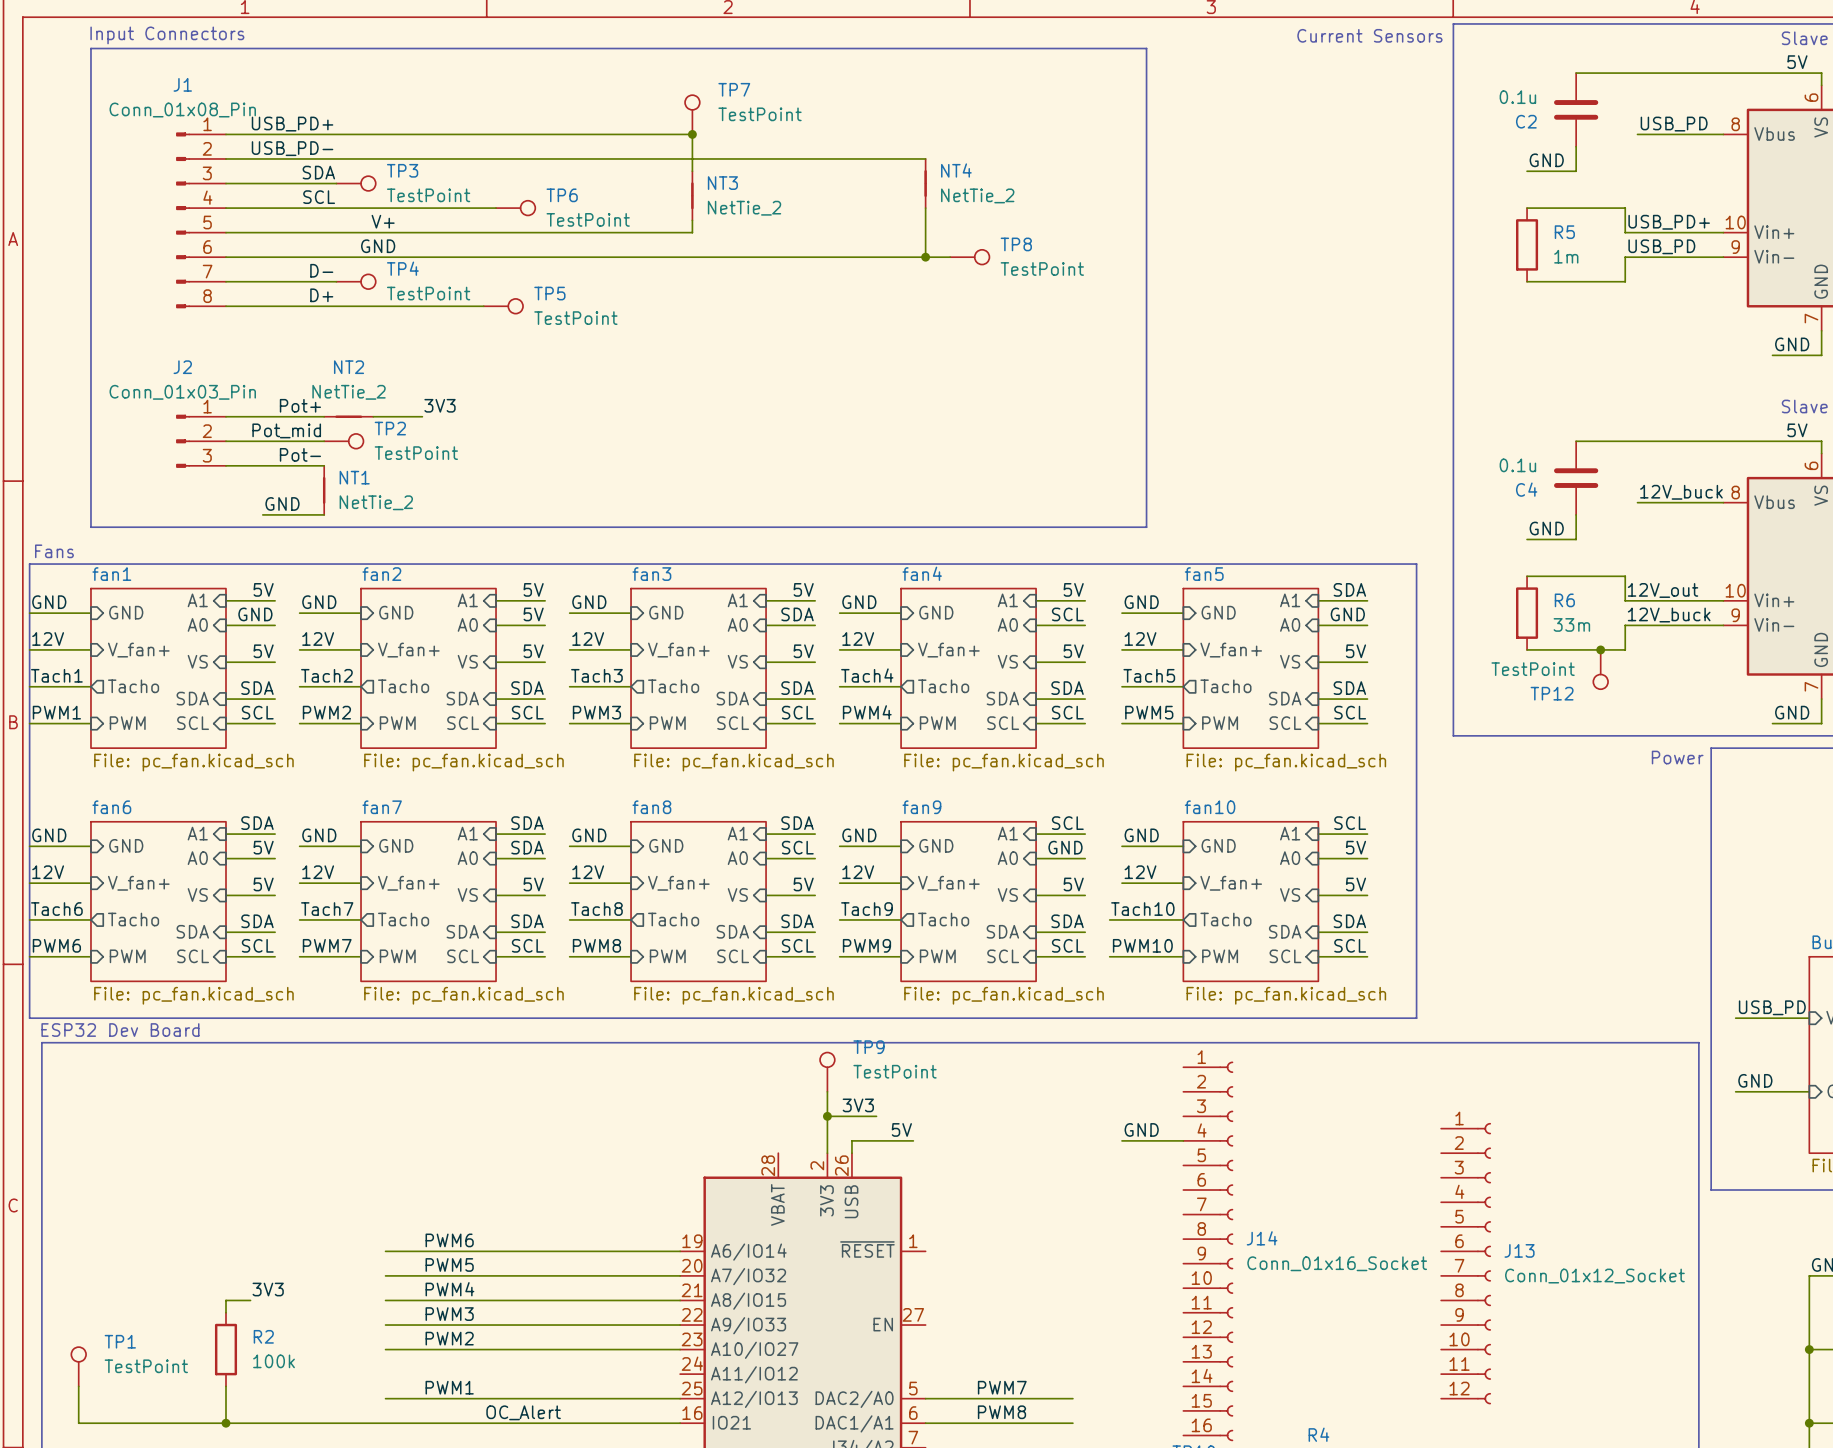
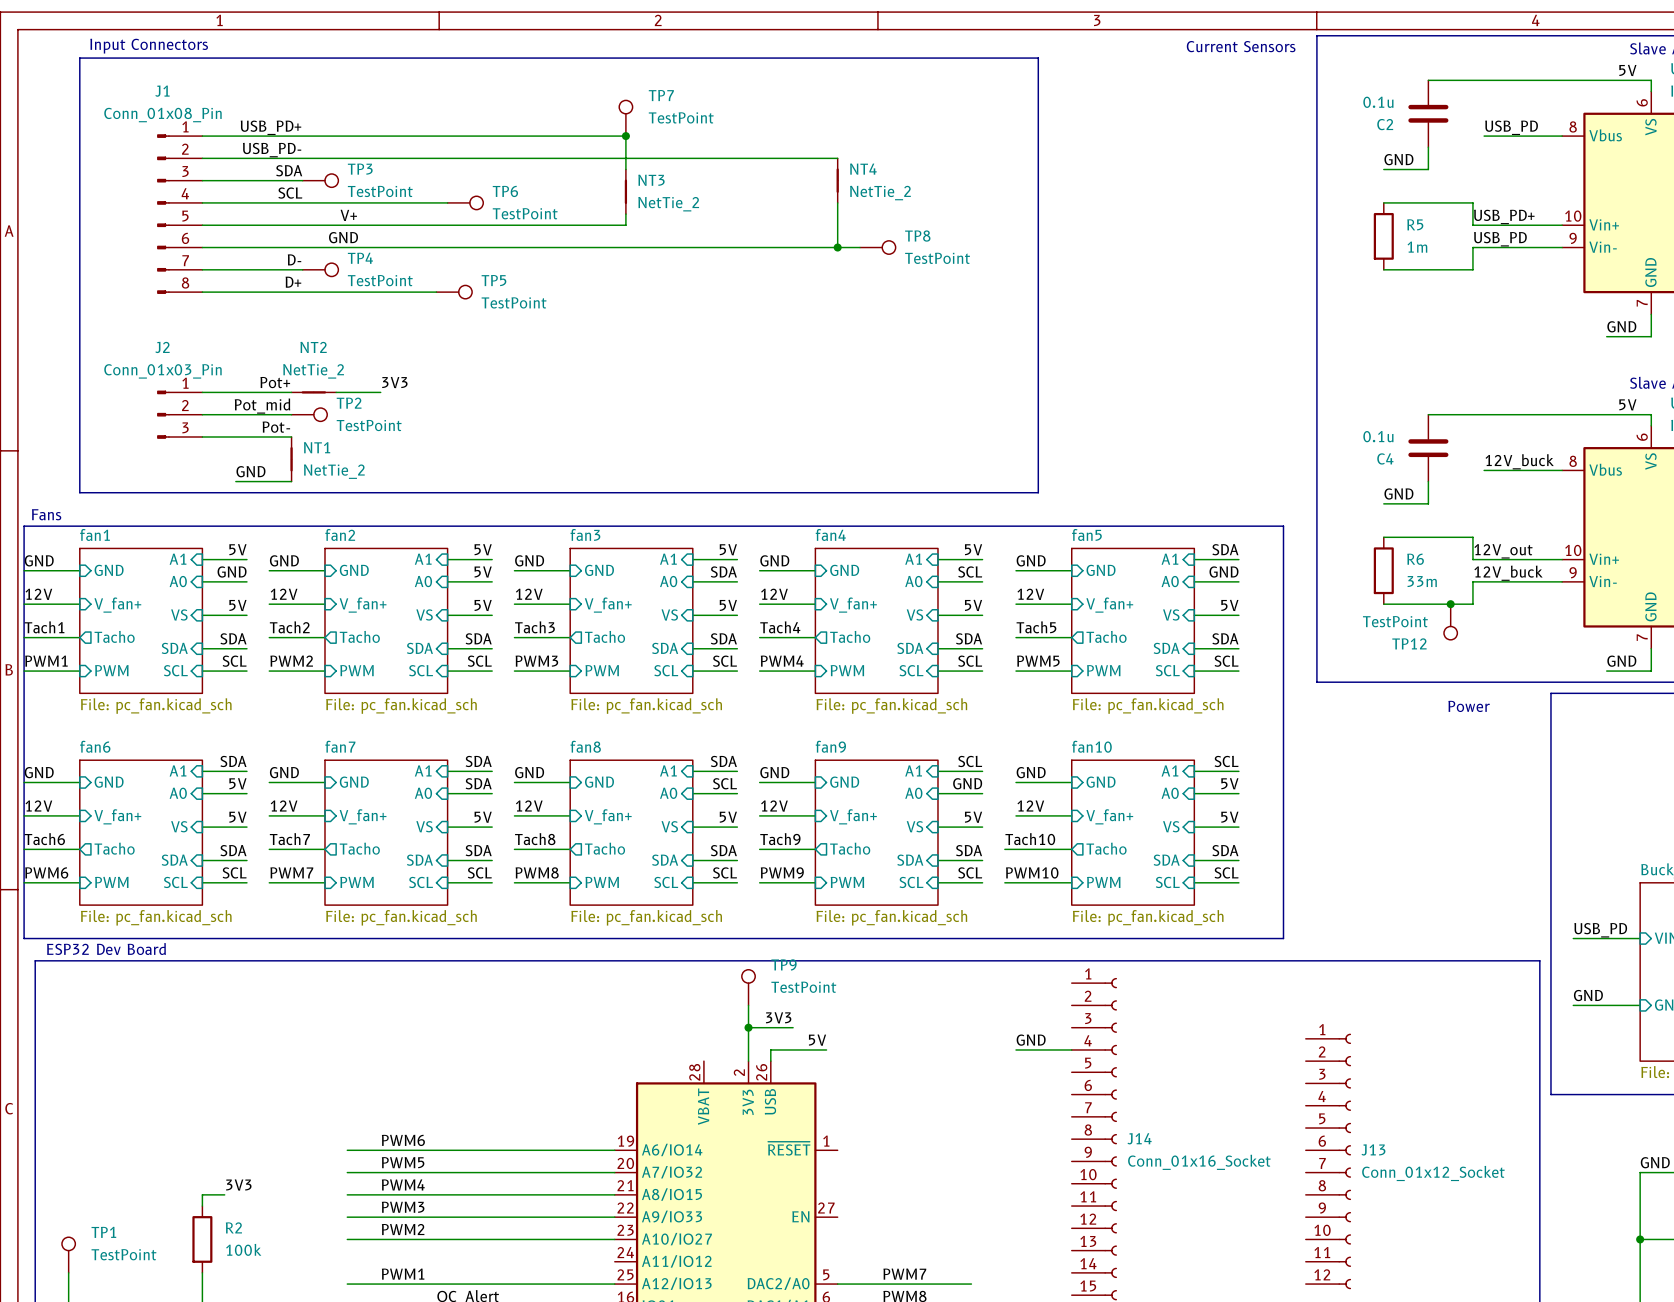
text position: Power (1677, 757) -> Power (1469, 706)

